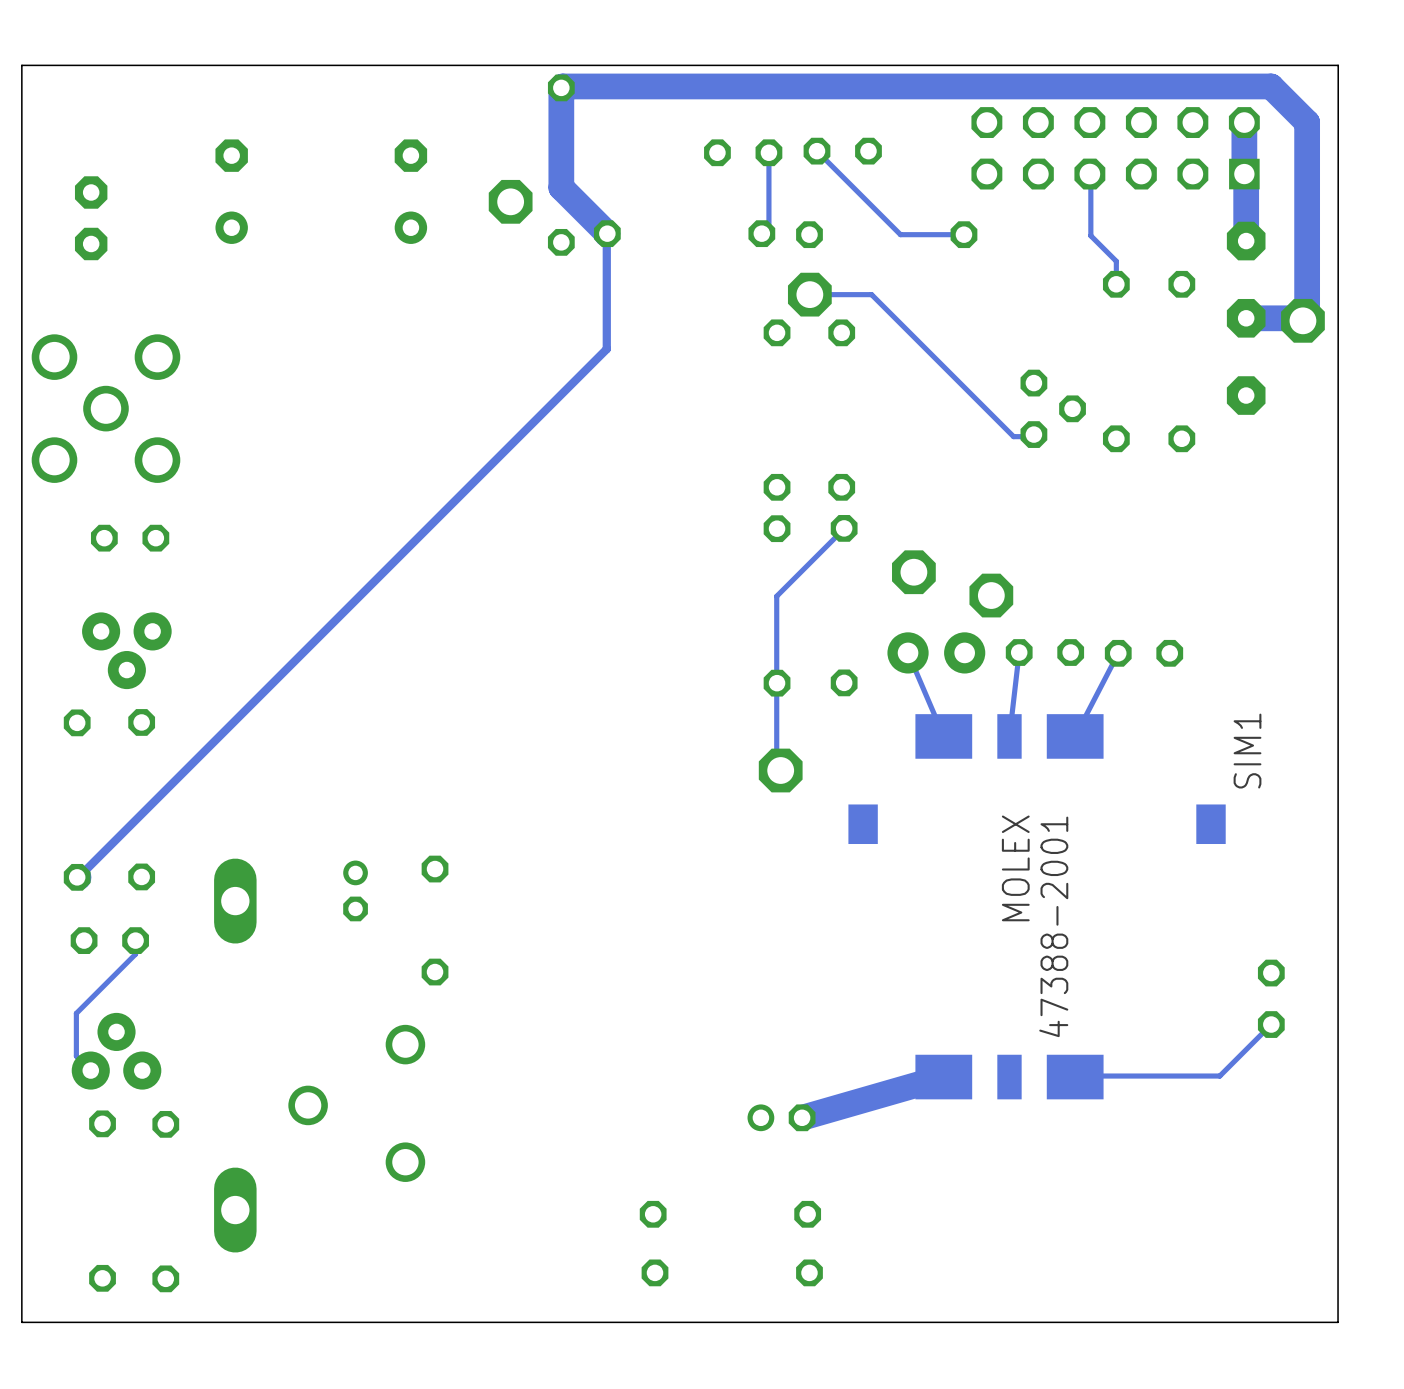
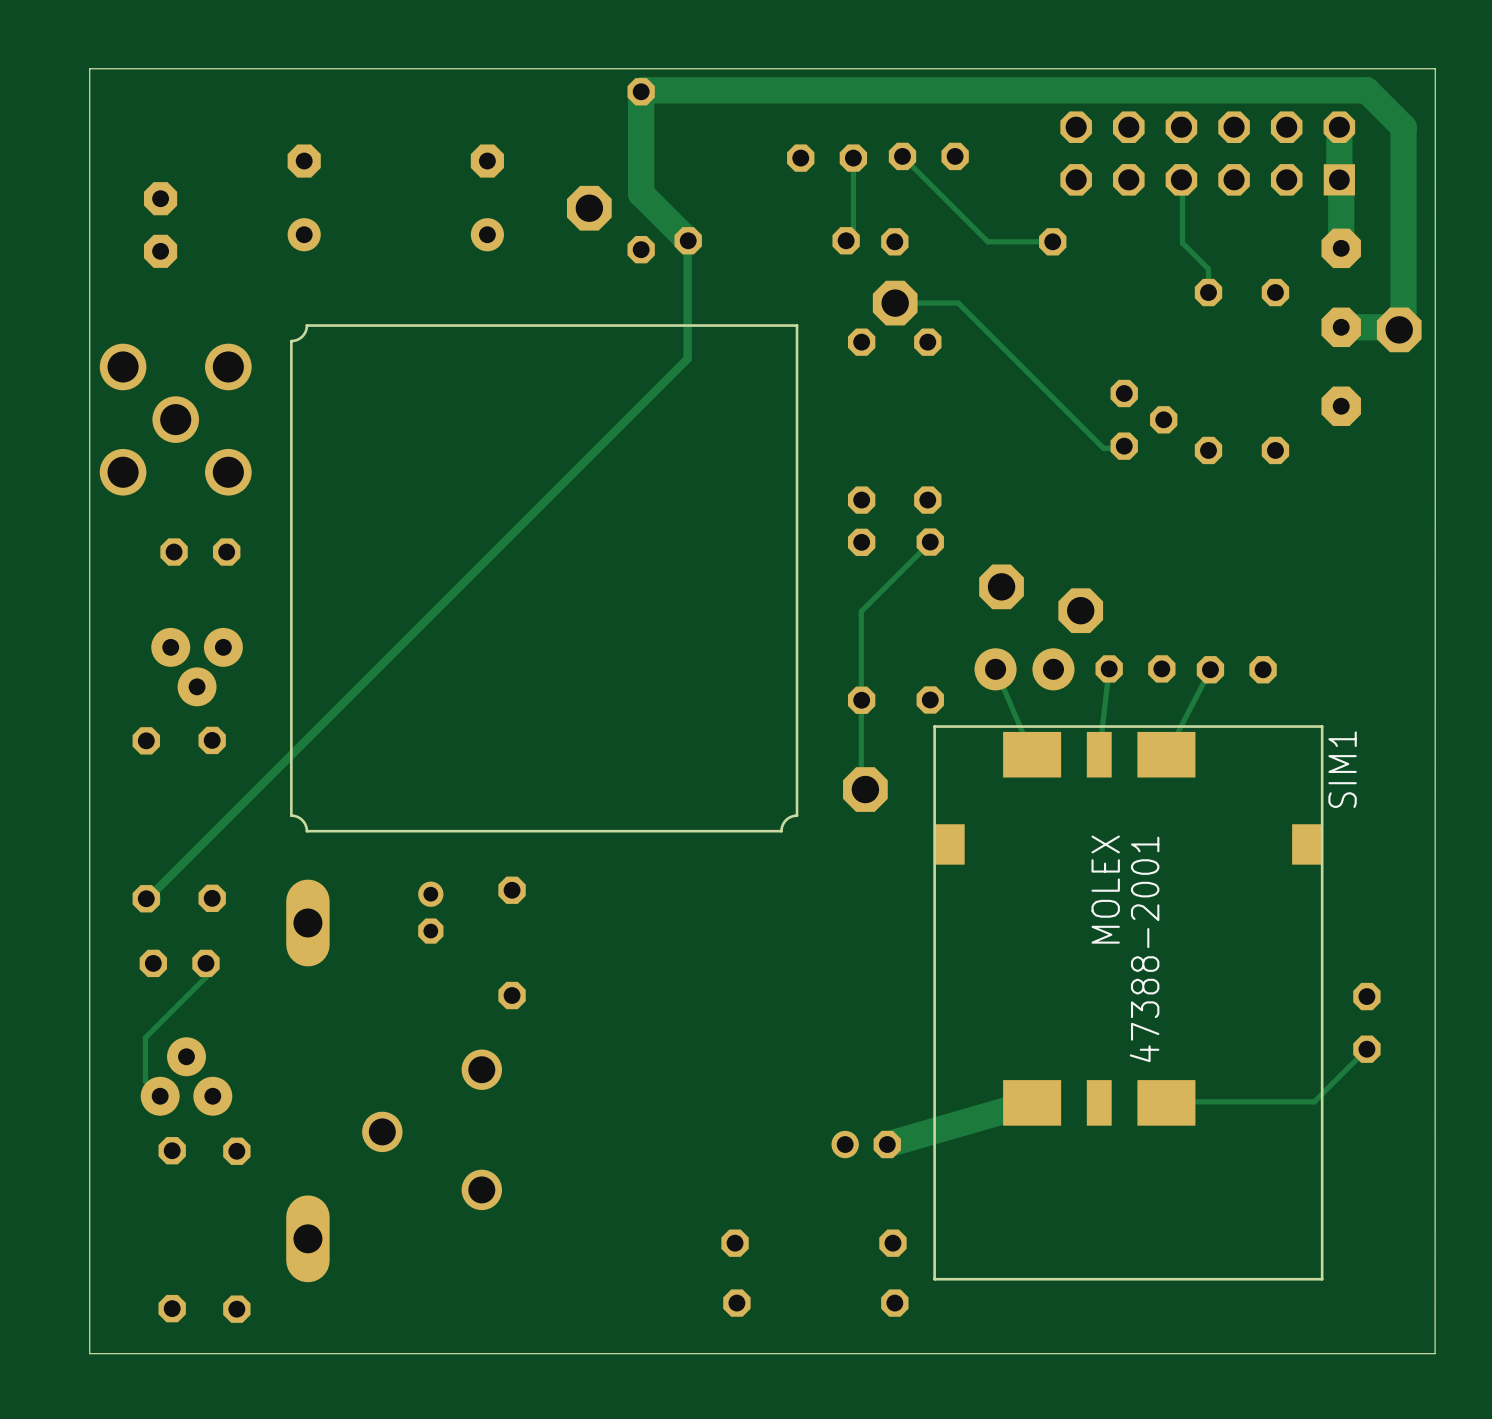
part: none -> (544, 578)
SIM1 footprint: [848, 714, 1226, 1100] -> [933, 725, 1324, 1281]

